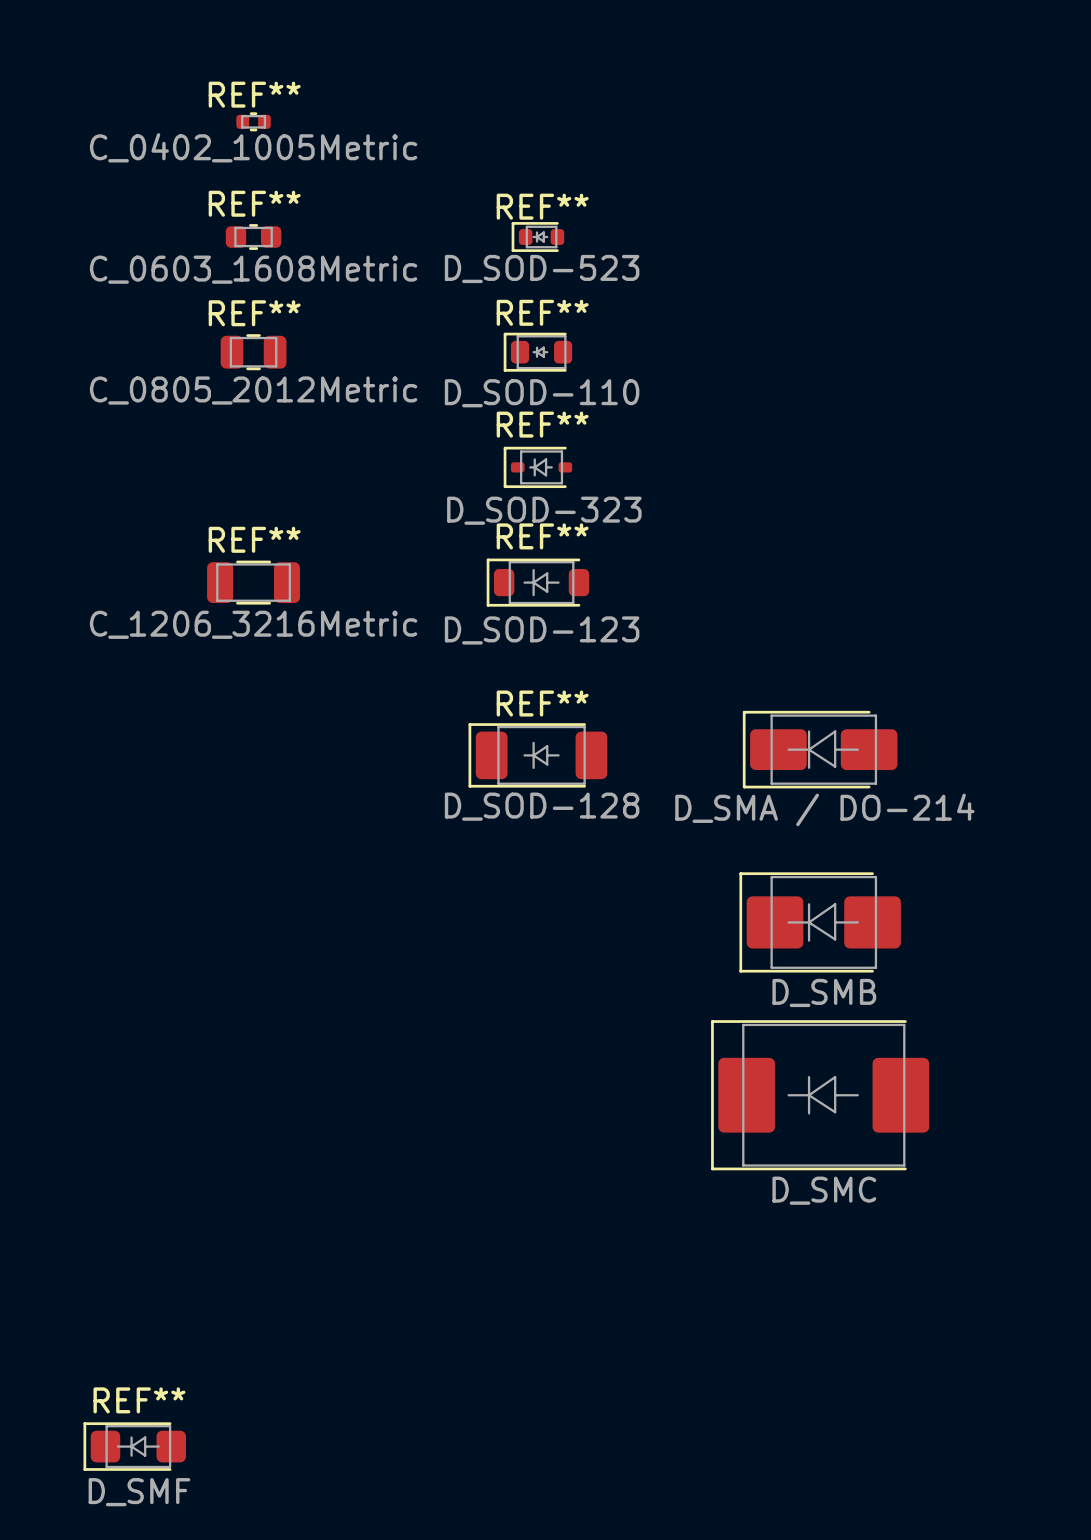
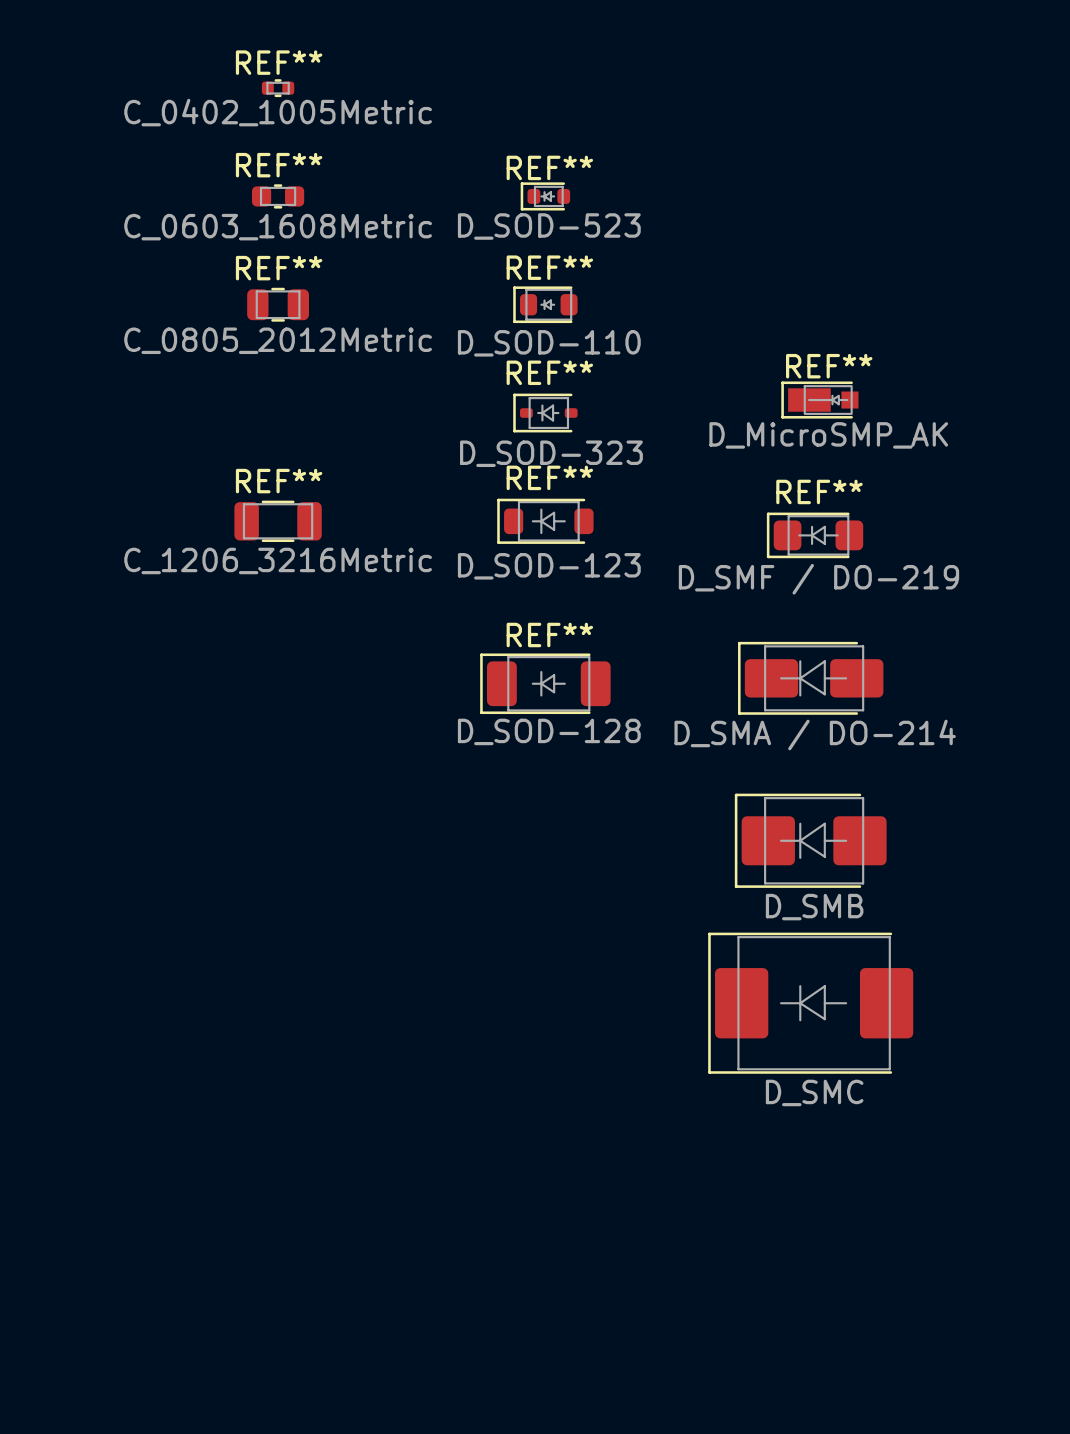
REF**: none -> D_MicroSMP_AK (819, 400)
REF**: none -> D_SMF / DO-219 (815, 535)
REF**: D_SMF (134, 1446) -> none

